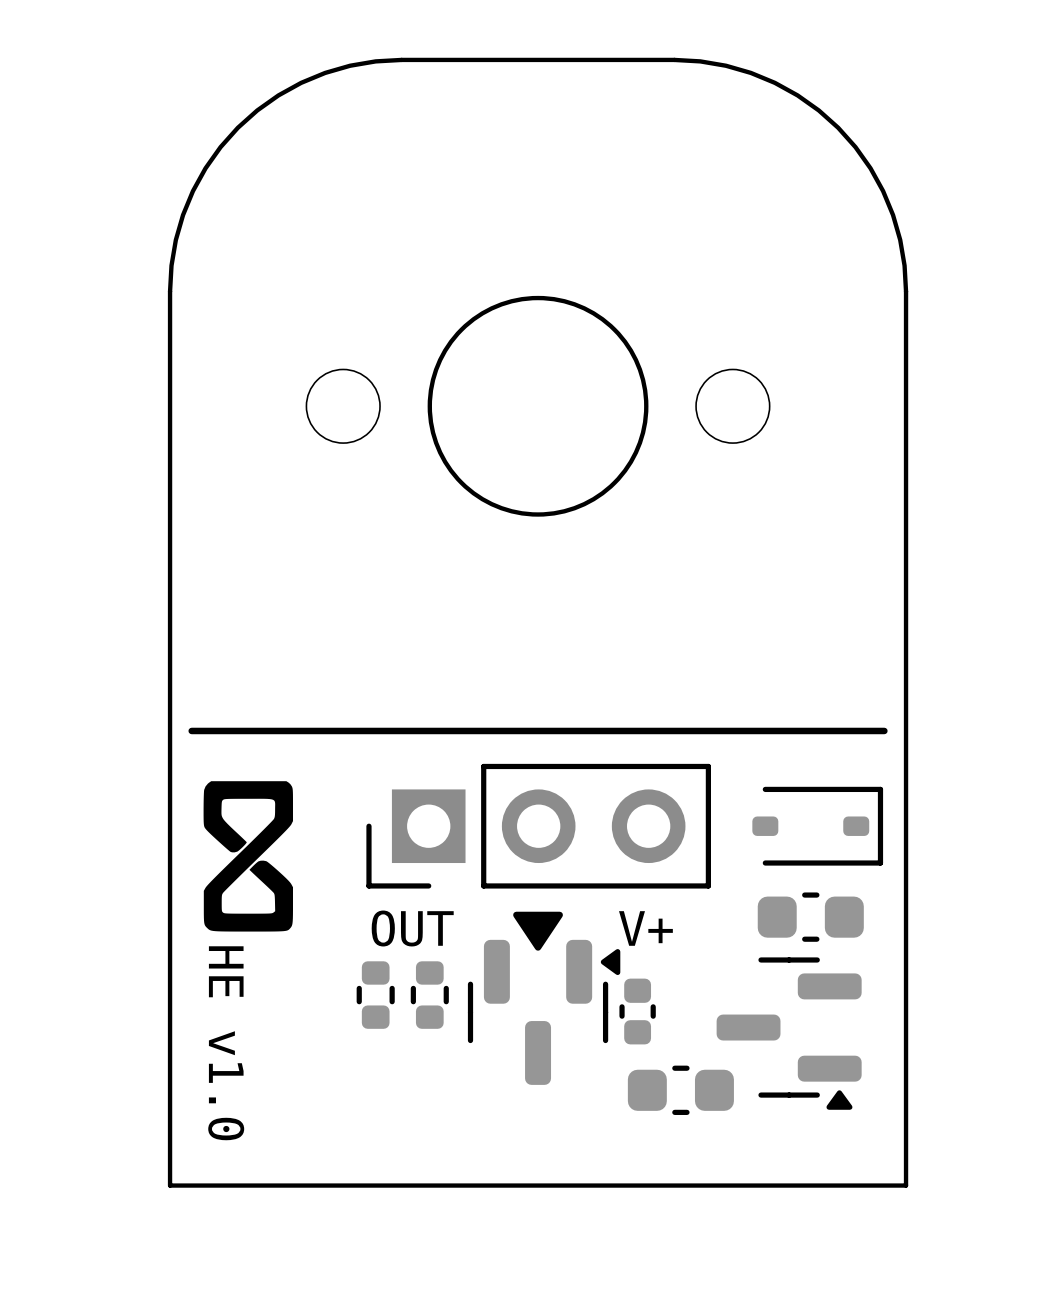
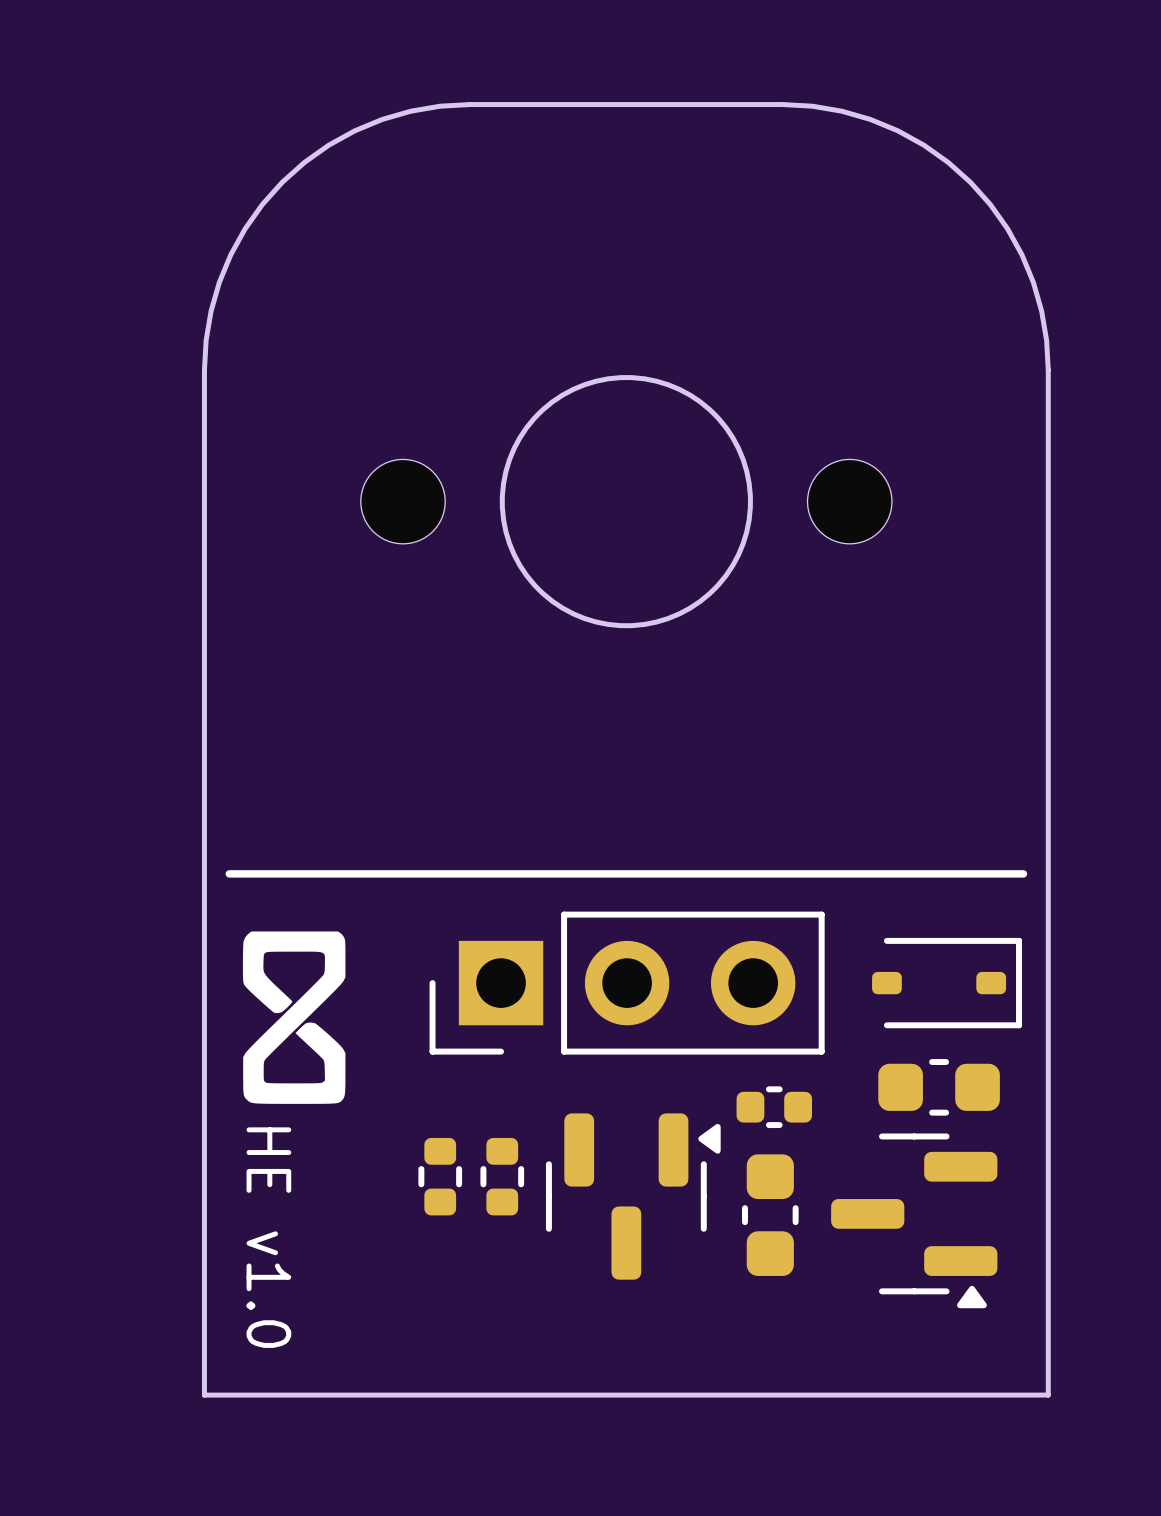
drawing: [513, 911, 563, 951] -> none
text: OUT (412, 928) -> none
text: V+ (645, 928) -> none
part: none -> (774, 1107)
part footprint: [619, 978, 656, 1045] -> [742, 1154, 799, 1276]
part: (680, 1090) -> none

